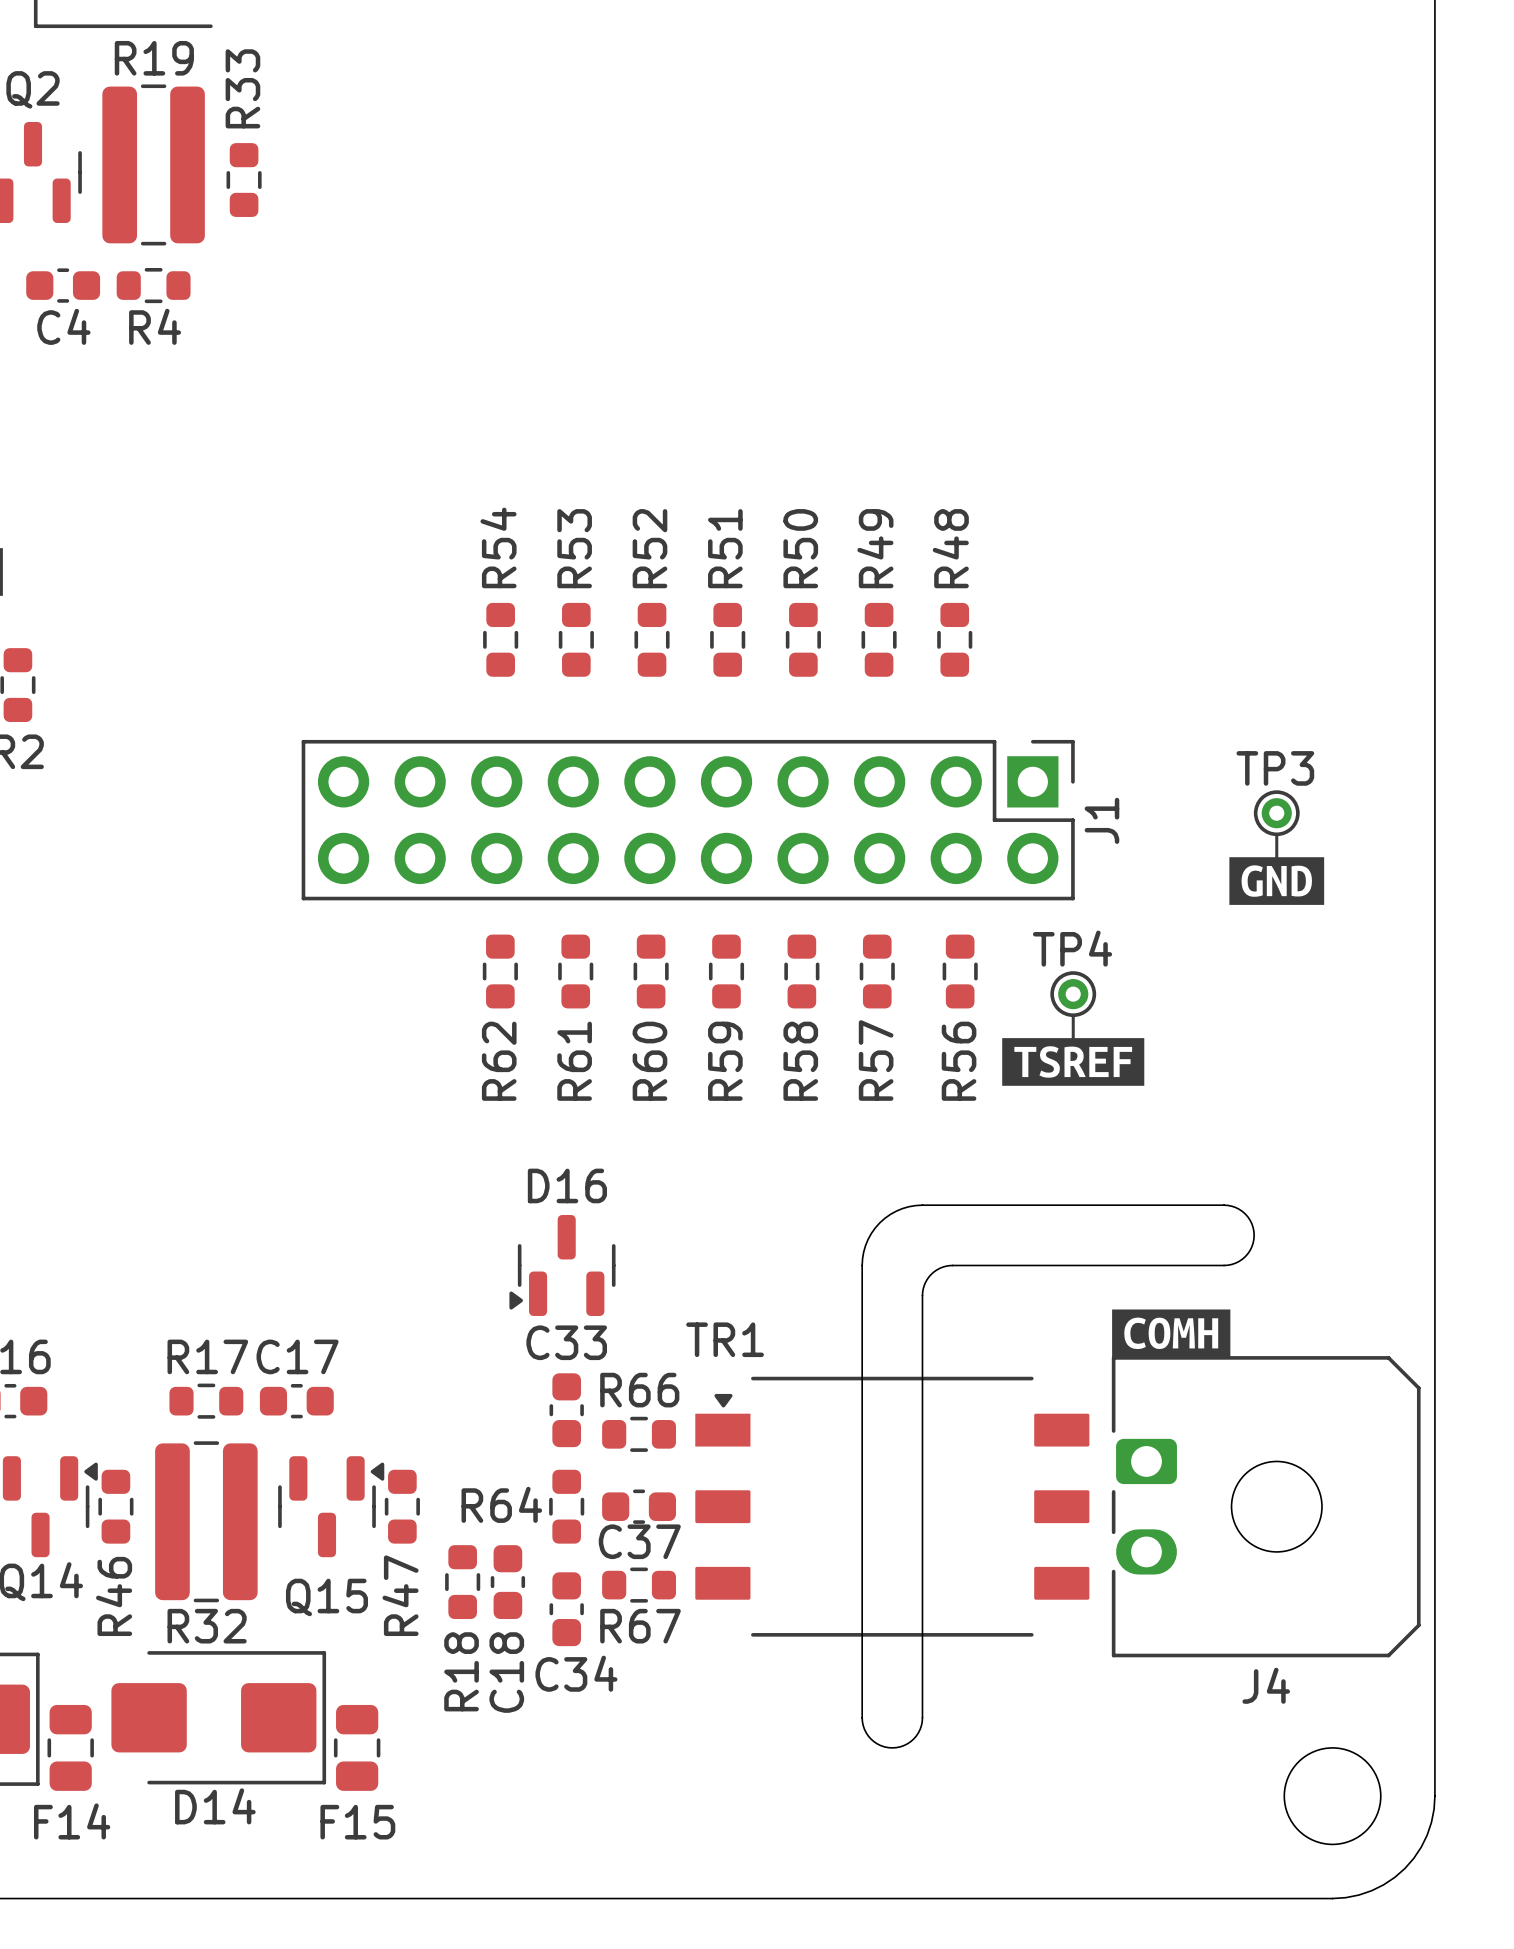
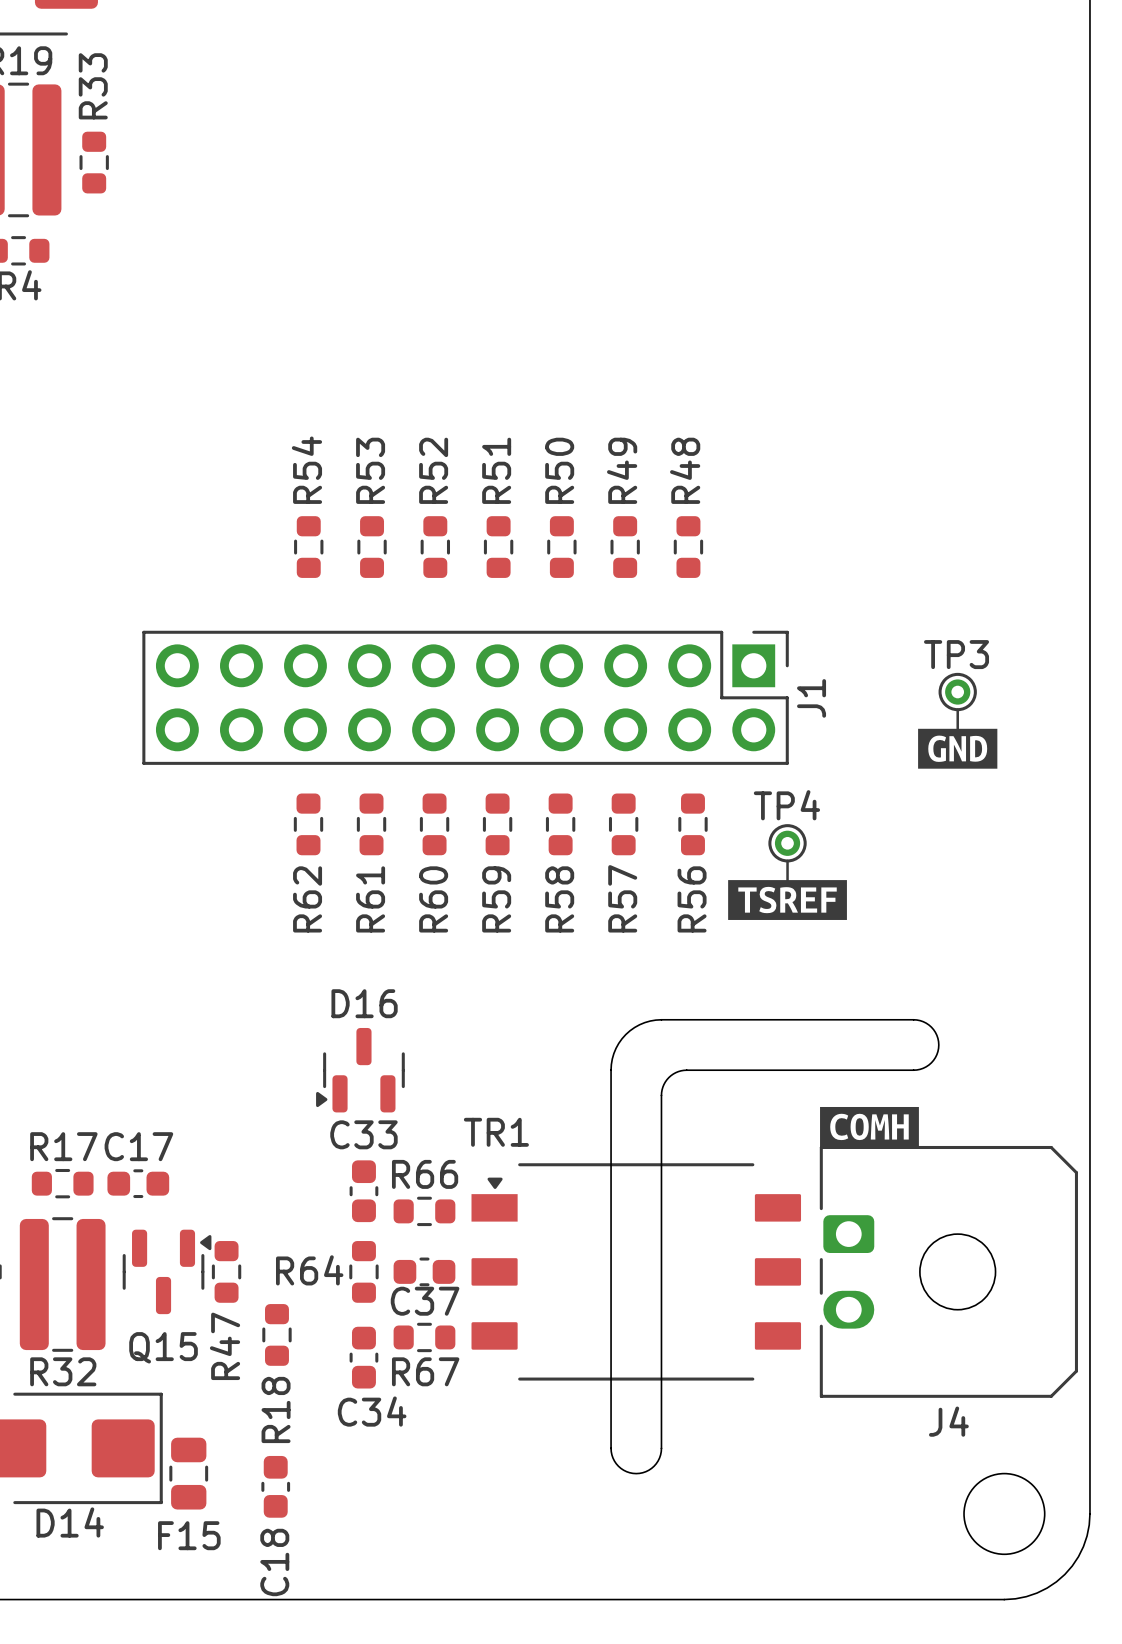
C18 position: (507, 1582) -> (275, 1486)

